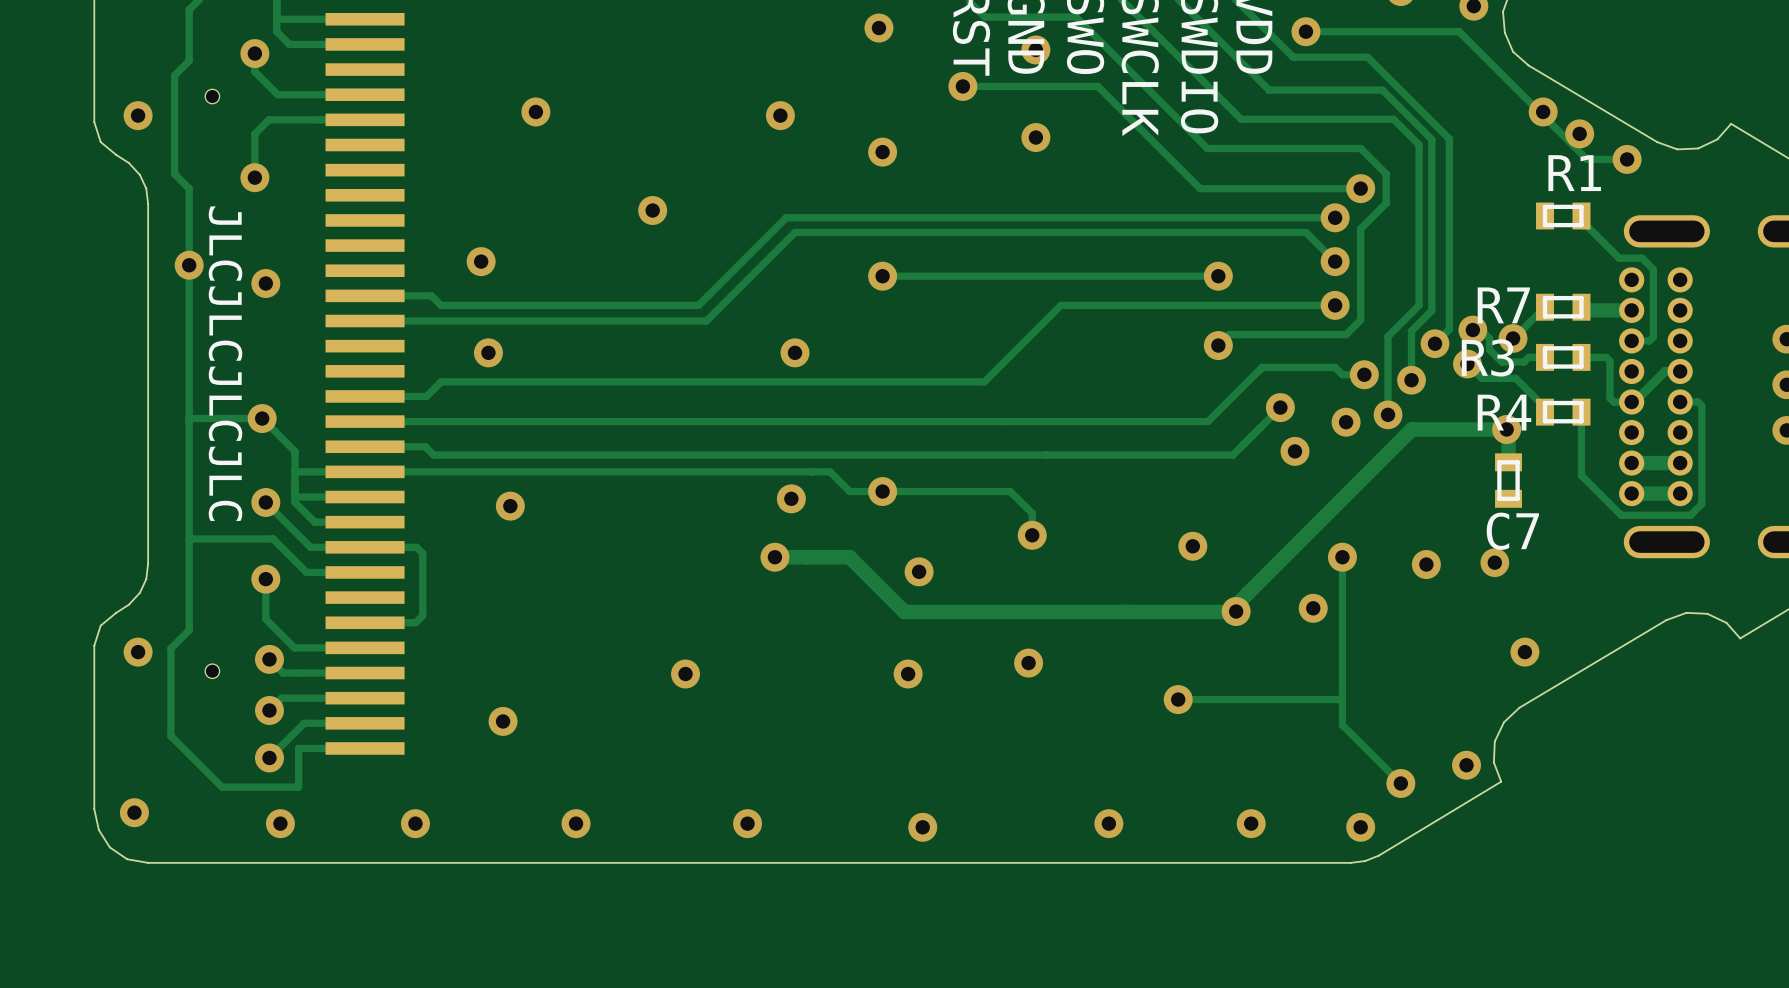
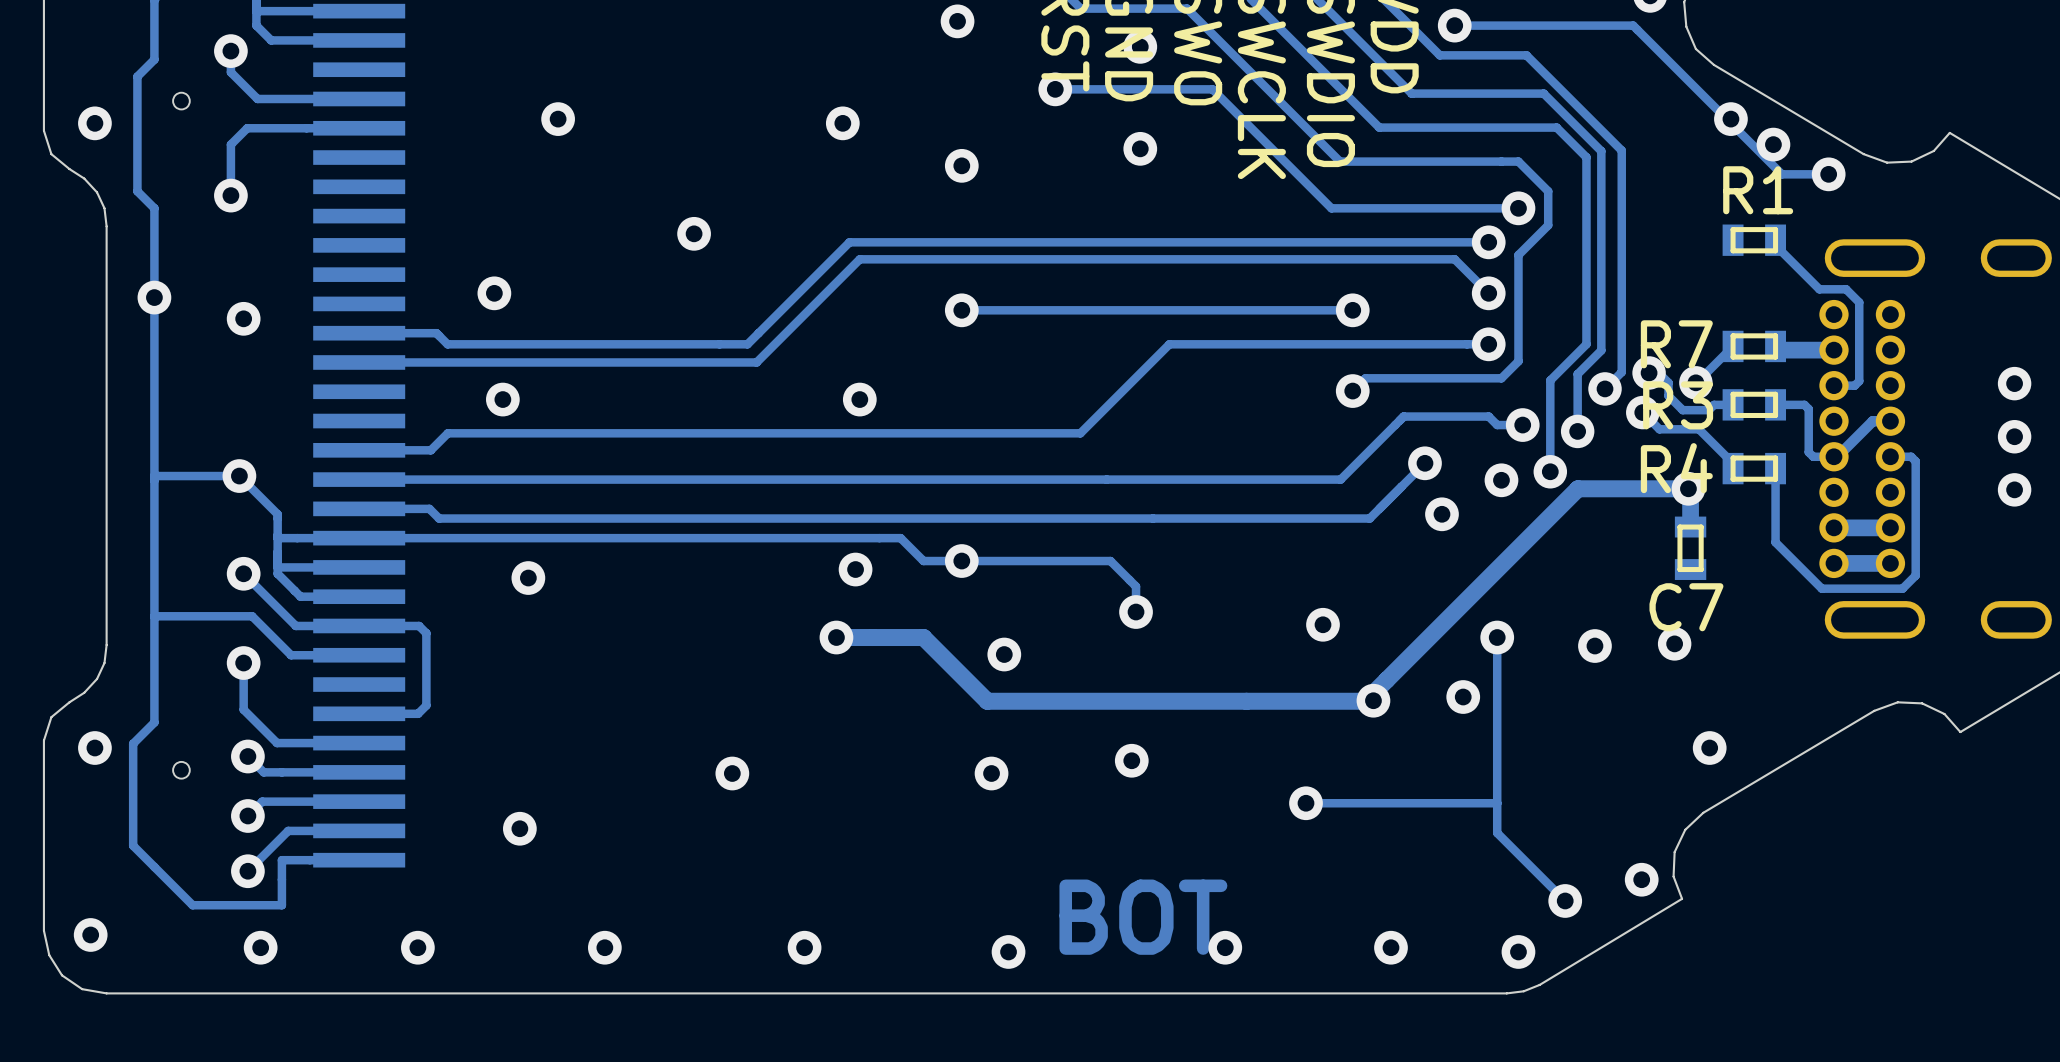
text: JLCJLCJLCJLC (225, 363) -> none
text: none -> BOT (1143, 917)

